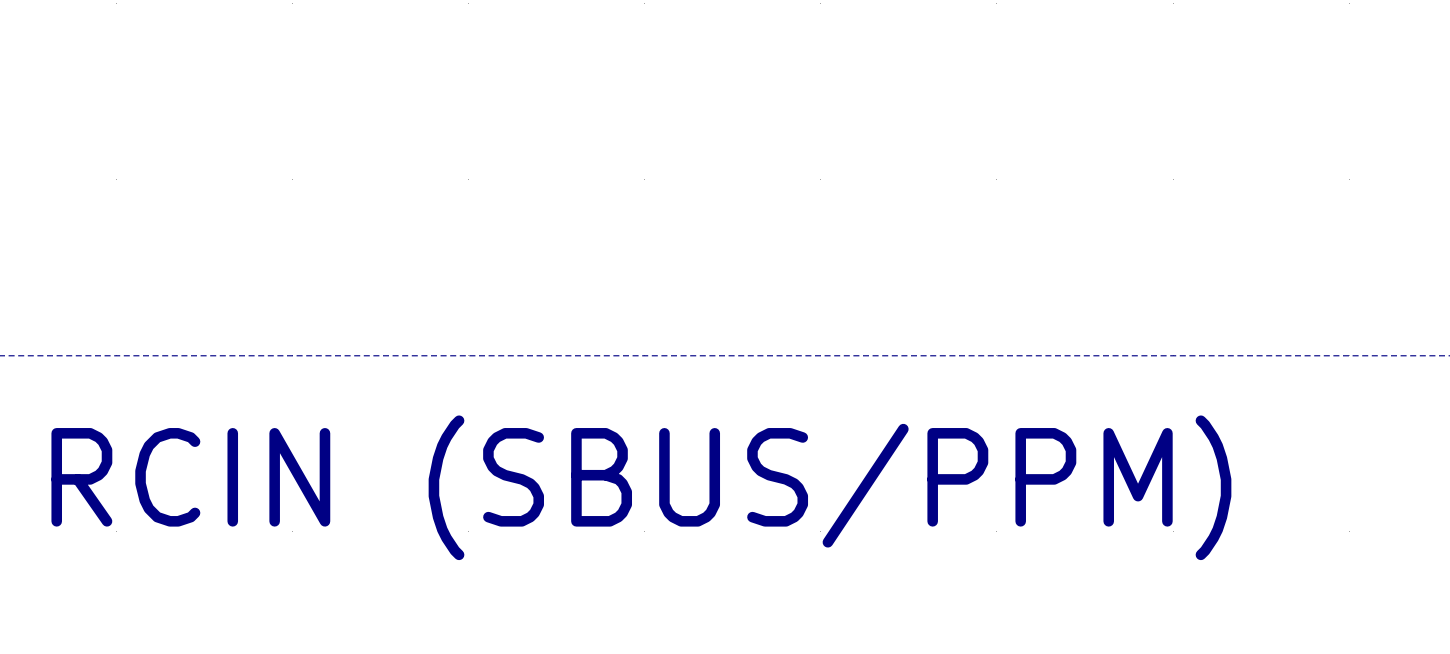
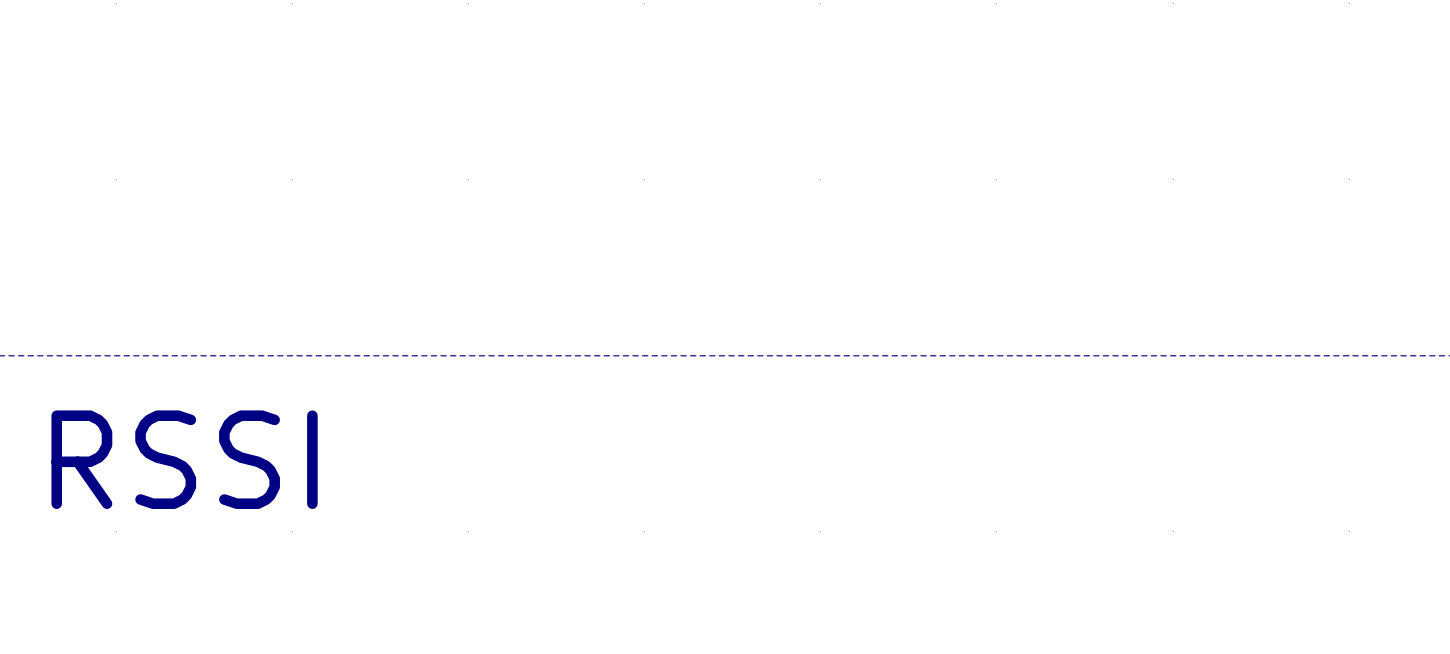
text: RCIN (SBUS/PPM) (641, 487) -> RSSI (184, 459)

